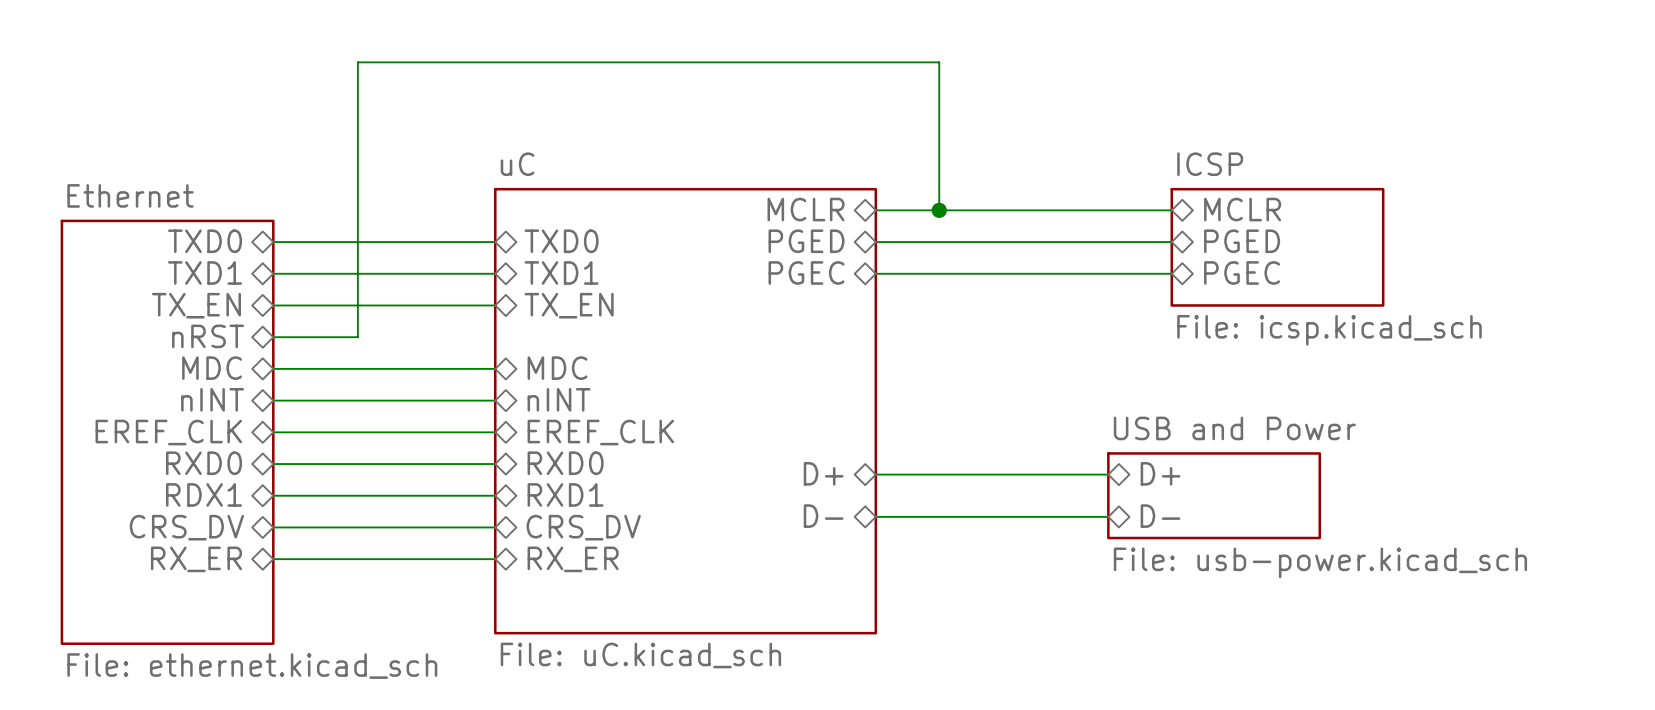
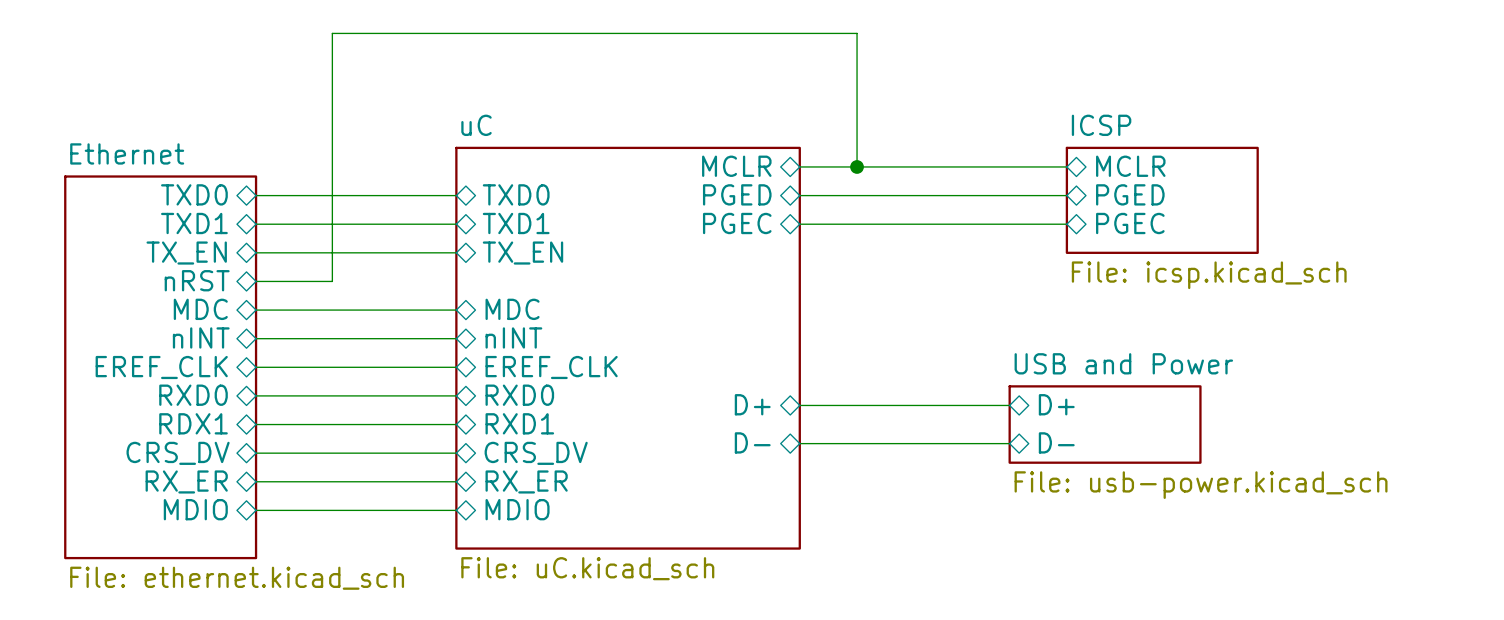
sheet pin: none -> MDIO (195, 509)
wire: none -> (256, 510) (456, 510)
sheet pin: none -> MDIO (517, 509)

